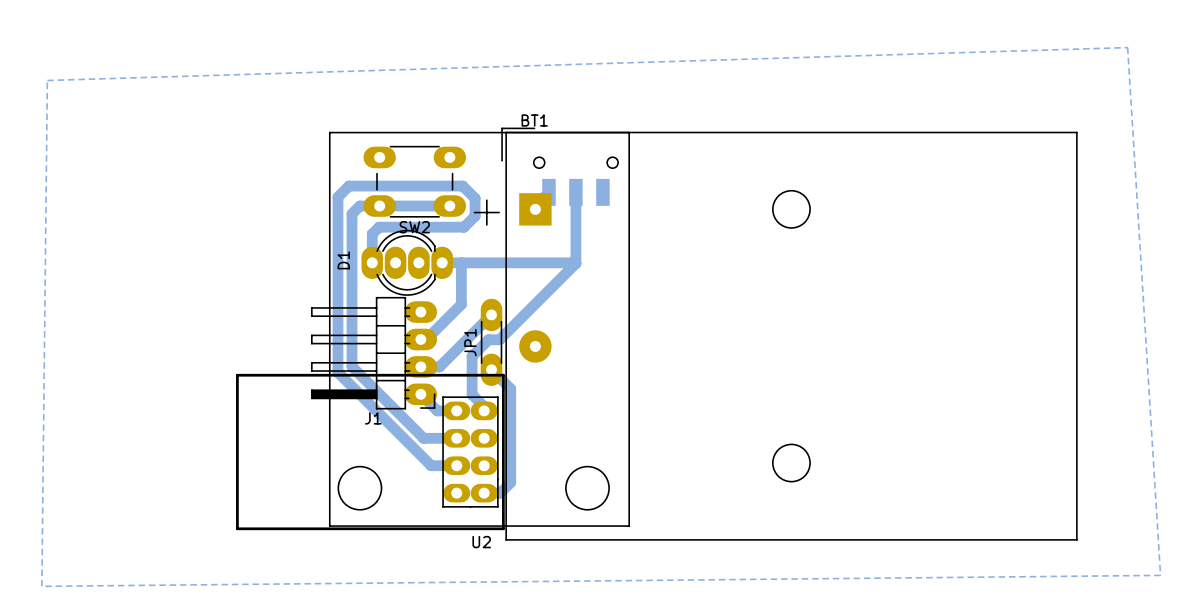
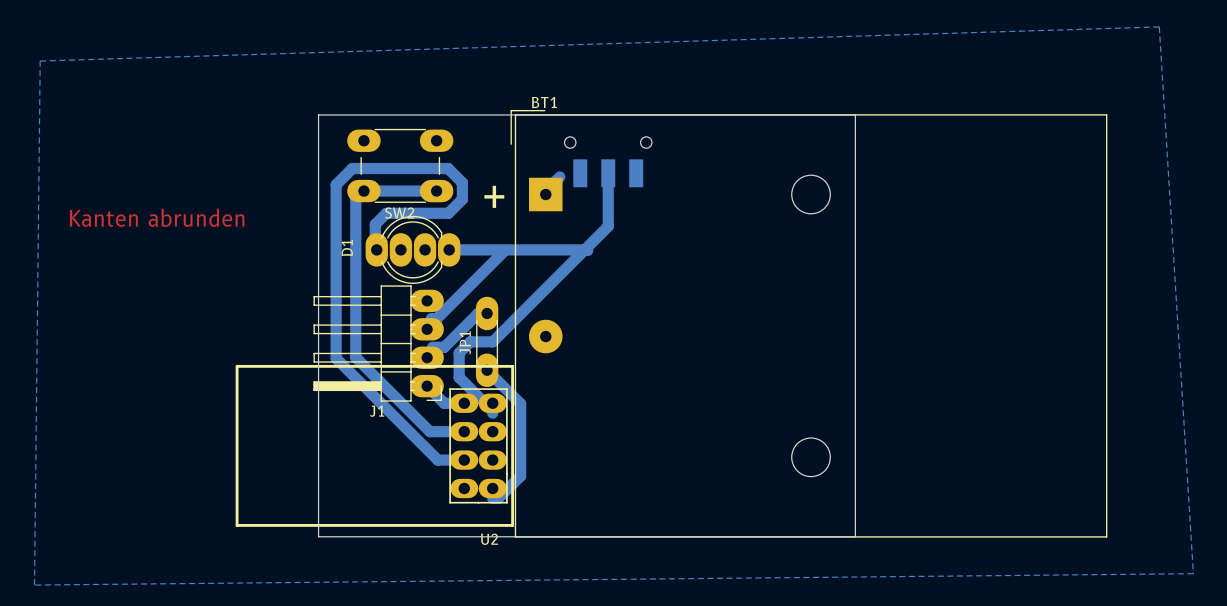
board edge: (329, 132) (329, 526) (629, 526) (629, 132) -> (332, 114) (318, 114) (318, 536) (855, 536) (855, 114) (642, 114)
SW2 position: (414, 181) -> (400, 165)
part position: (575, 181) -> (608, 162)
bottom track: none -> (608, 173) (608, 226) (492, 341) (470, 341) (459, 353) (459, 377) (492, 410) (492, 413)
bottom track: (575, 192) (575, 263) (499, 339) (488, 339) (472, 356) (472, 394) (484, 406) (484, 410) -> none
text: none -> Kanten abrunden (157, 217)
bottom track: (372, 262) (372, 234) (379, 227) (464, 227) (475, 216) (475, 198) (462, 186) (348, 186) (337, 197) (337, 372) -> (375, 246) (375, 224) (386, 213) (448, 213) (462, 199) (462, 182) (448, 168) (352, 168) (336, 184) (336, 358) (341, 363)
bottom track: (461, 262) (461, 304) (426, 339) (420, 339) -> none
bottom track: none -> (503, 252) (436, 318) (431, 318)
bottom track: (491, 314) (439, 366) (420, 366) -> none
bottom track: none -> (487, 313) (478, 313) (444, 347) (432, 347)
JP1 position: (491, 342) -> (487, 341)
bottom track: (491, 369) (510, 388) (510, 482) (500, 493) (484, 493) -> none
bottom track: none -> (487, 370) (520, 403) (520, 476) (498, 498) (492, 498)
round board edge: [337, 466, 383, 511] -> none
round board edge: [565, 466, 610, 511] -> none

